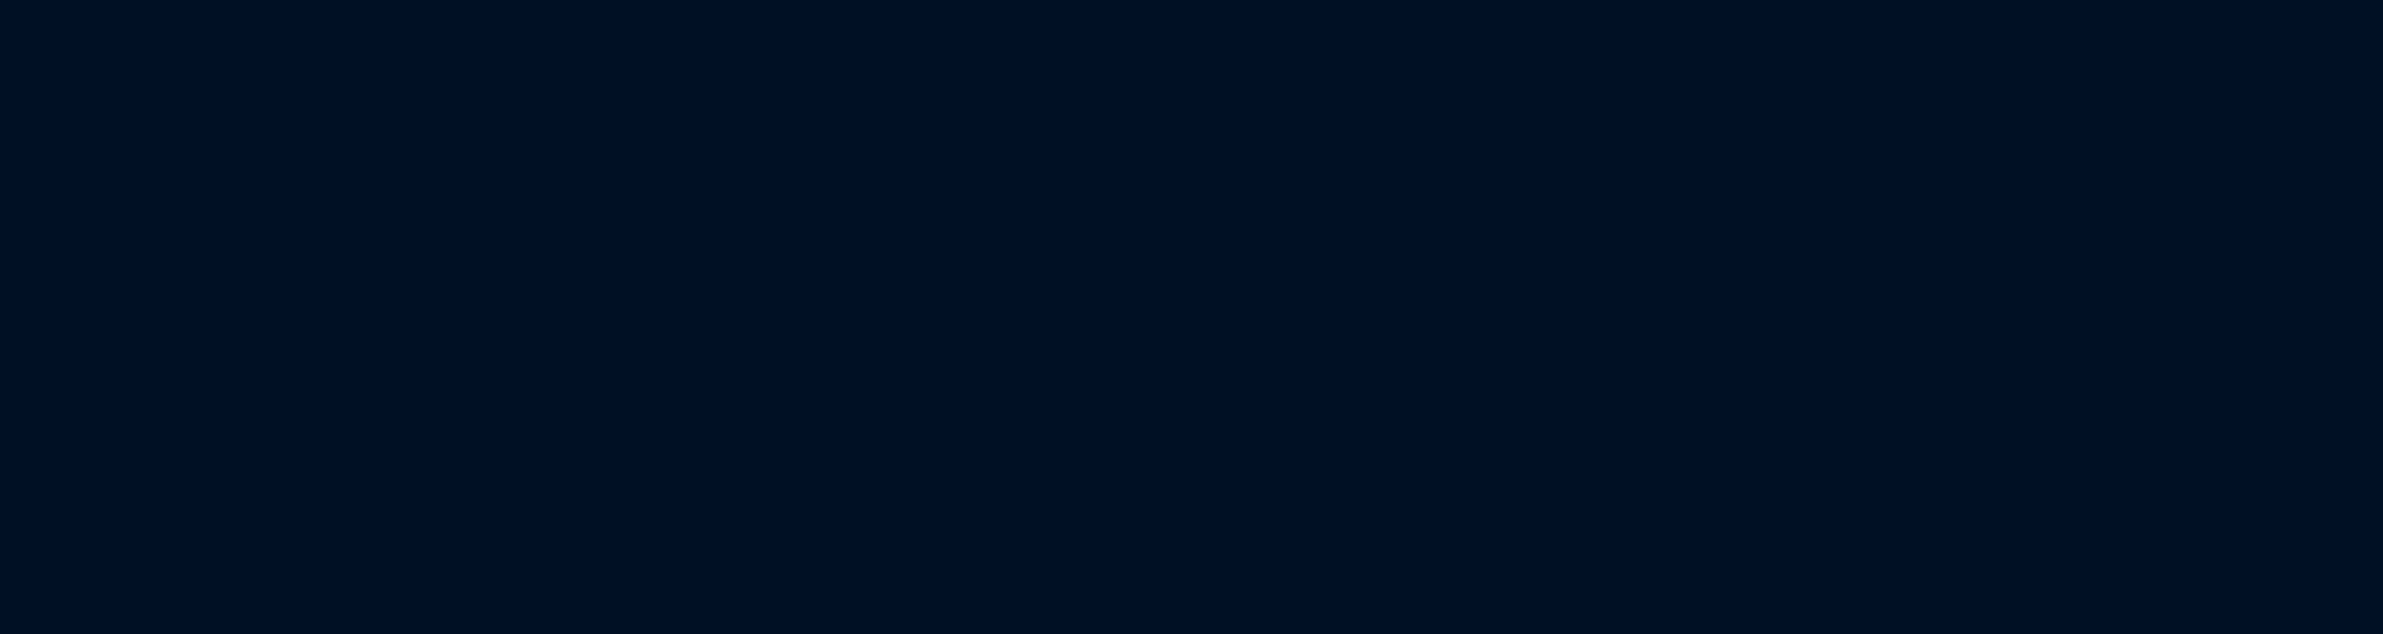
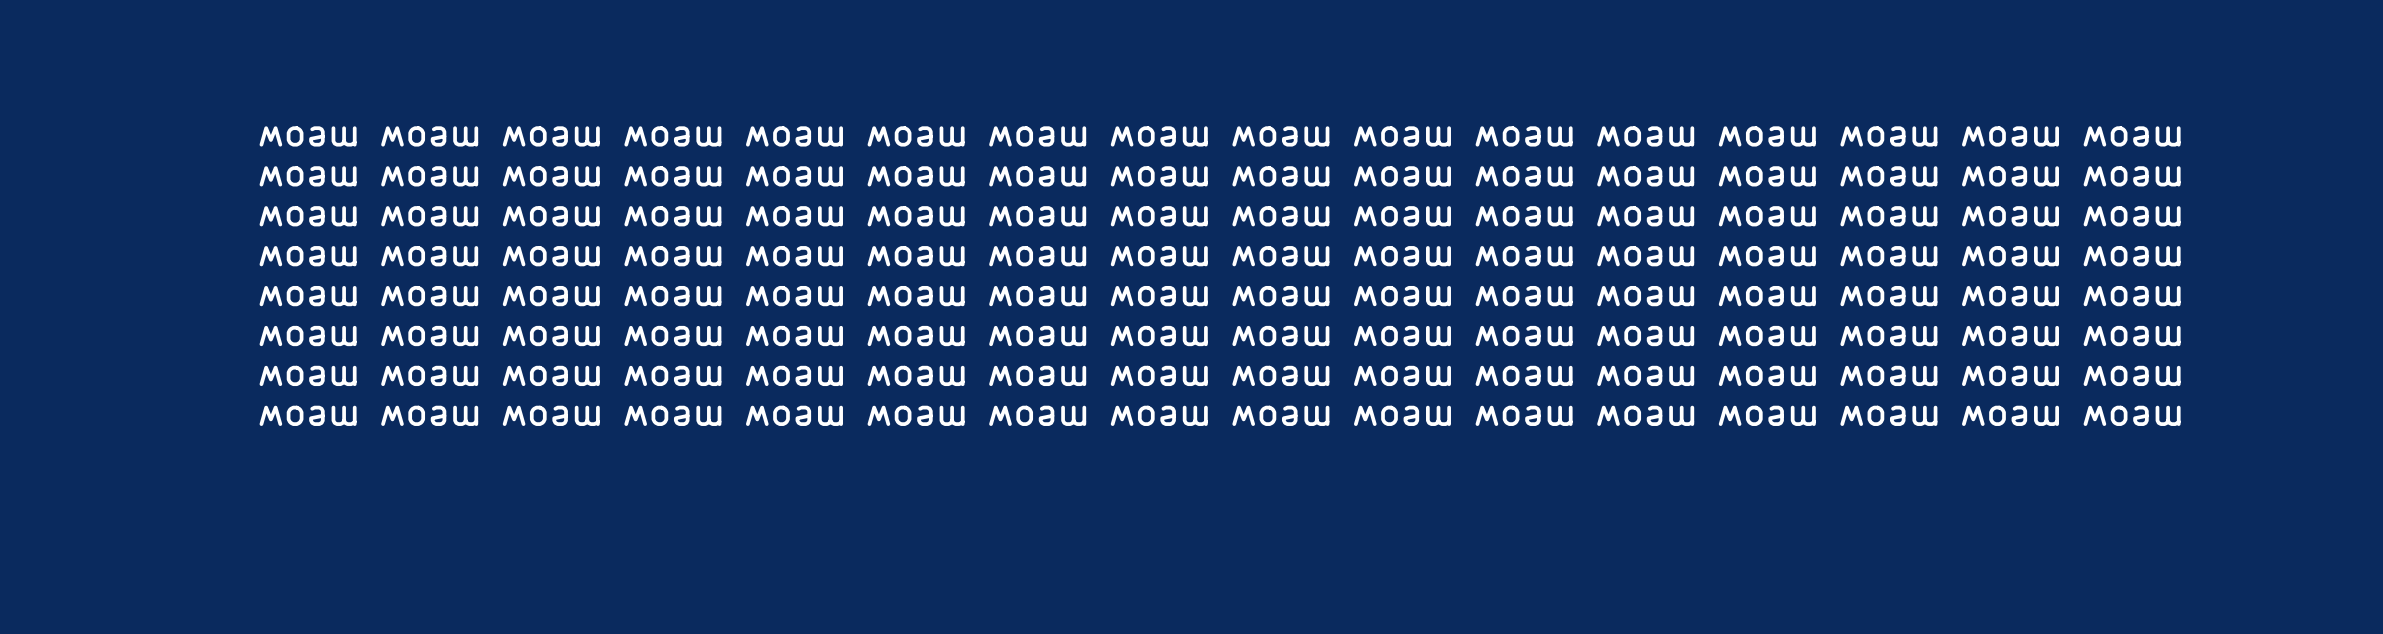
text: none -> meow meow meow meow meow meow meow meow meow meow meow meow meow meow meow meow (1220, 136)
text: none -> meow meow meow meow meow meow meow meow meow meow meow meow meow meow meow meow (1220, 176)
text: none -> meow meow meow meow meow meow meow meow meow meow meow meow meow meow meow meow (1220, 216)
text: none -> meow meow meow meow meow meow meow meow meow meow meow meow meow meow meow meow (1220, 256)
text: none -> meow meow meow meow meow meow meow meow meow meow meow meow meow meow meow meow (1220, 296)
text: none -> meow meow meow meow meow meow meow meow meow meow meow meow meow meow meow meow (1220, 336)
text: none -> meow meow meow meow meow meow meow meow meow meow meow meow meow meow meow meow (1220, 375)
text: none -> meow meow meow meow meow meow meow meow meow meow meow meow meow meow meow meow (1220, 415)

